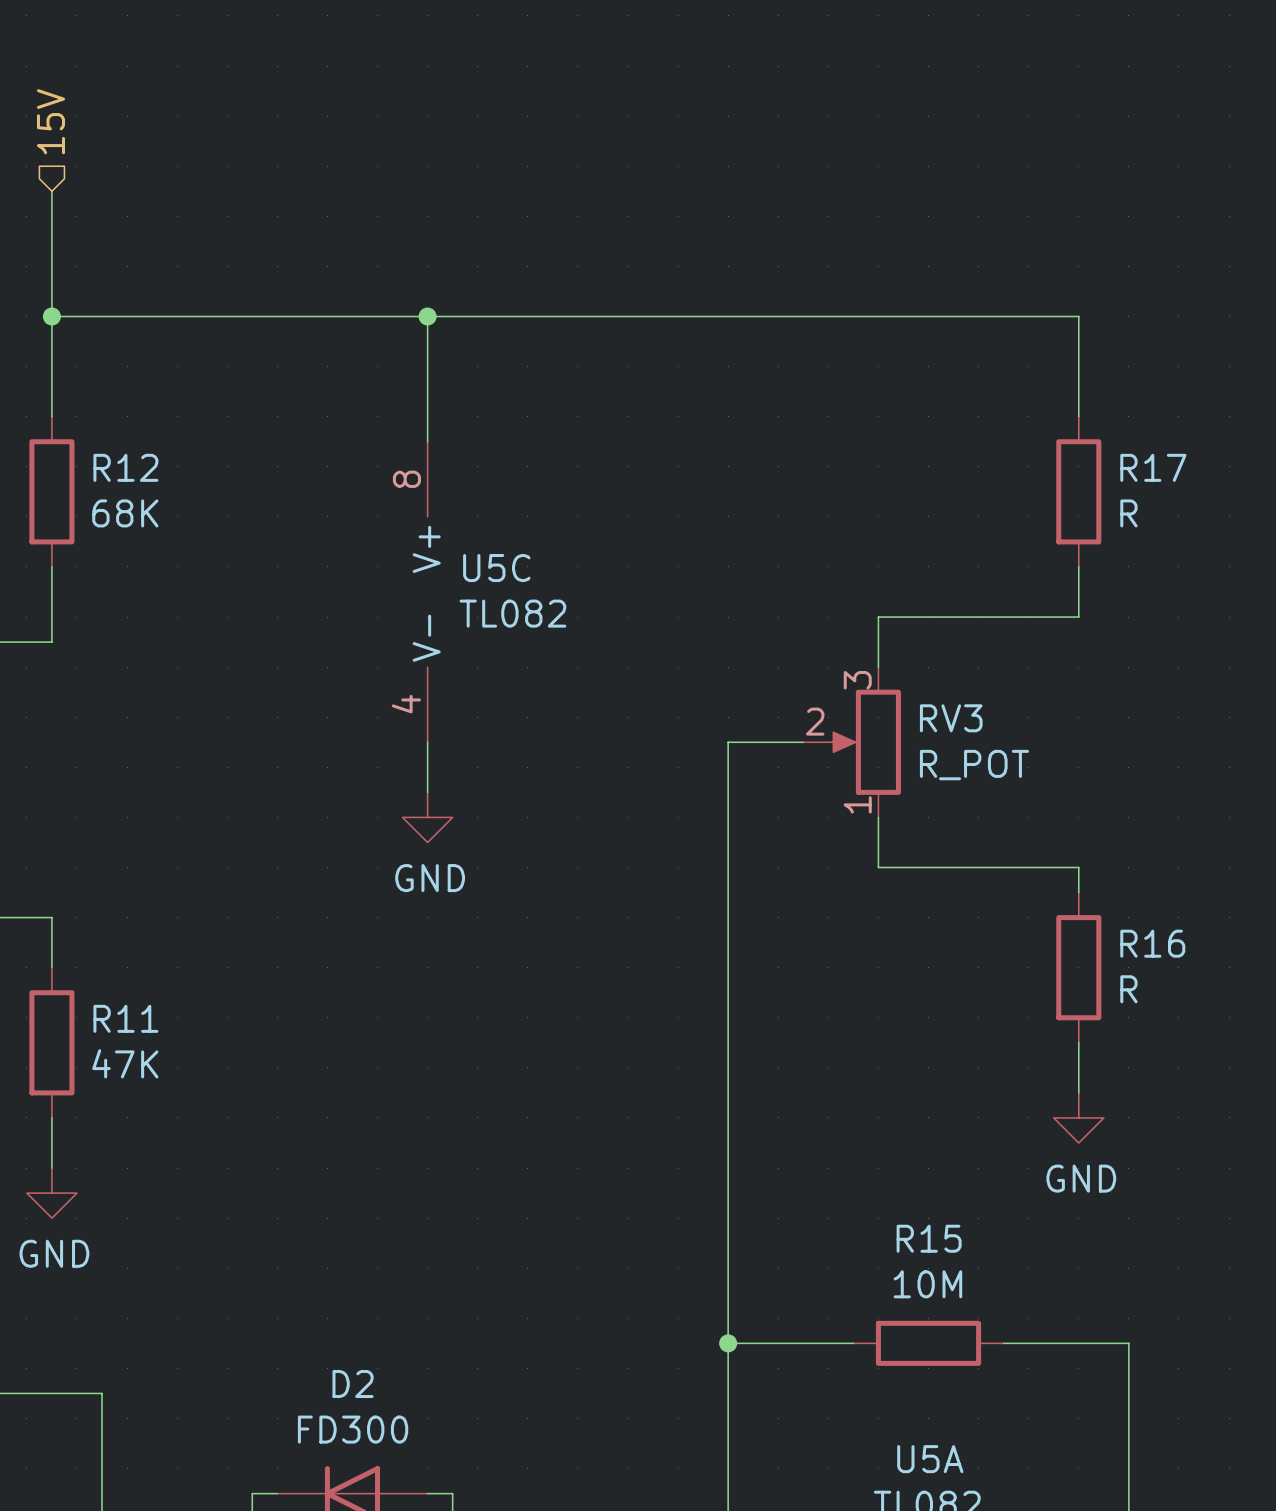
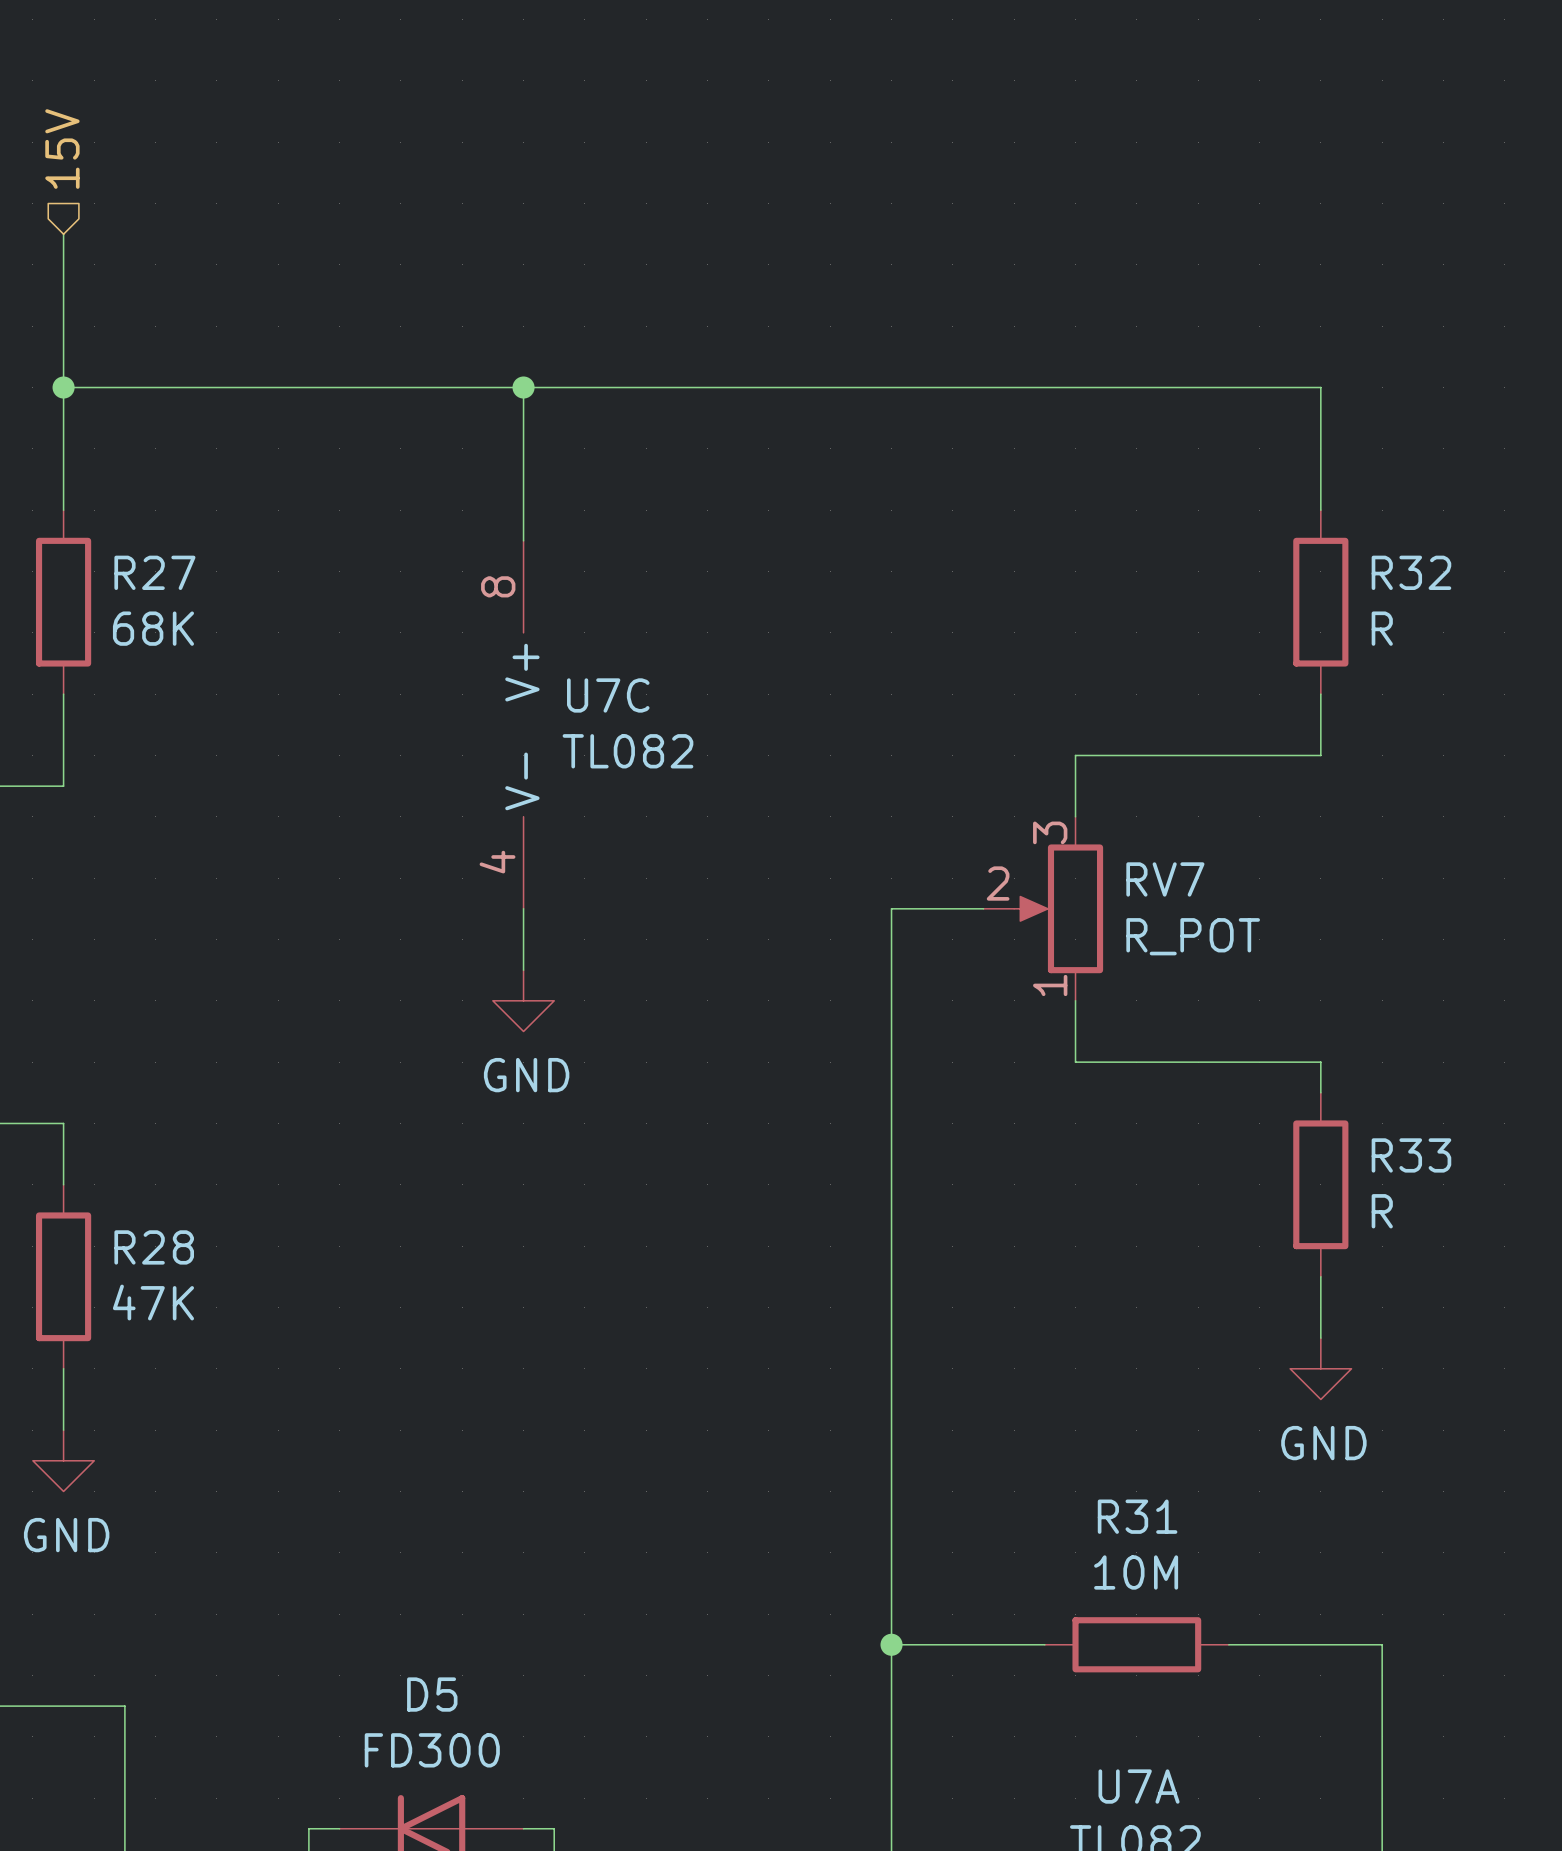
R12 name: R12 (125, 467) -> R27 (154, 572)
R17 name: R17 (1153, 467) -> R32 (1411, 572)
U5C name: U5C (496, 568) -> U7C (608, 695)
RV3 name: RV3 (951, 718) -> RV7 (1165, 879)
R16 name: R16 (1152, 943) -> R33 (1411, 1155)
R11 name: R11 (125, 1018) -> R28 (154, 1247)
R15 name: R15 (929, 1238) -> R31 (1137, 1516)
D2 name: D2 (353, 1384) -> D5 (432, 1694)
U5A name: U5A (930, 1459) -> U7A (1139, 1786)

